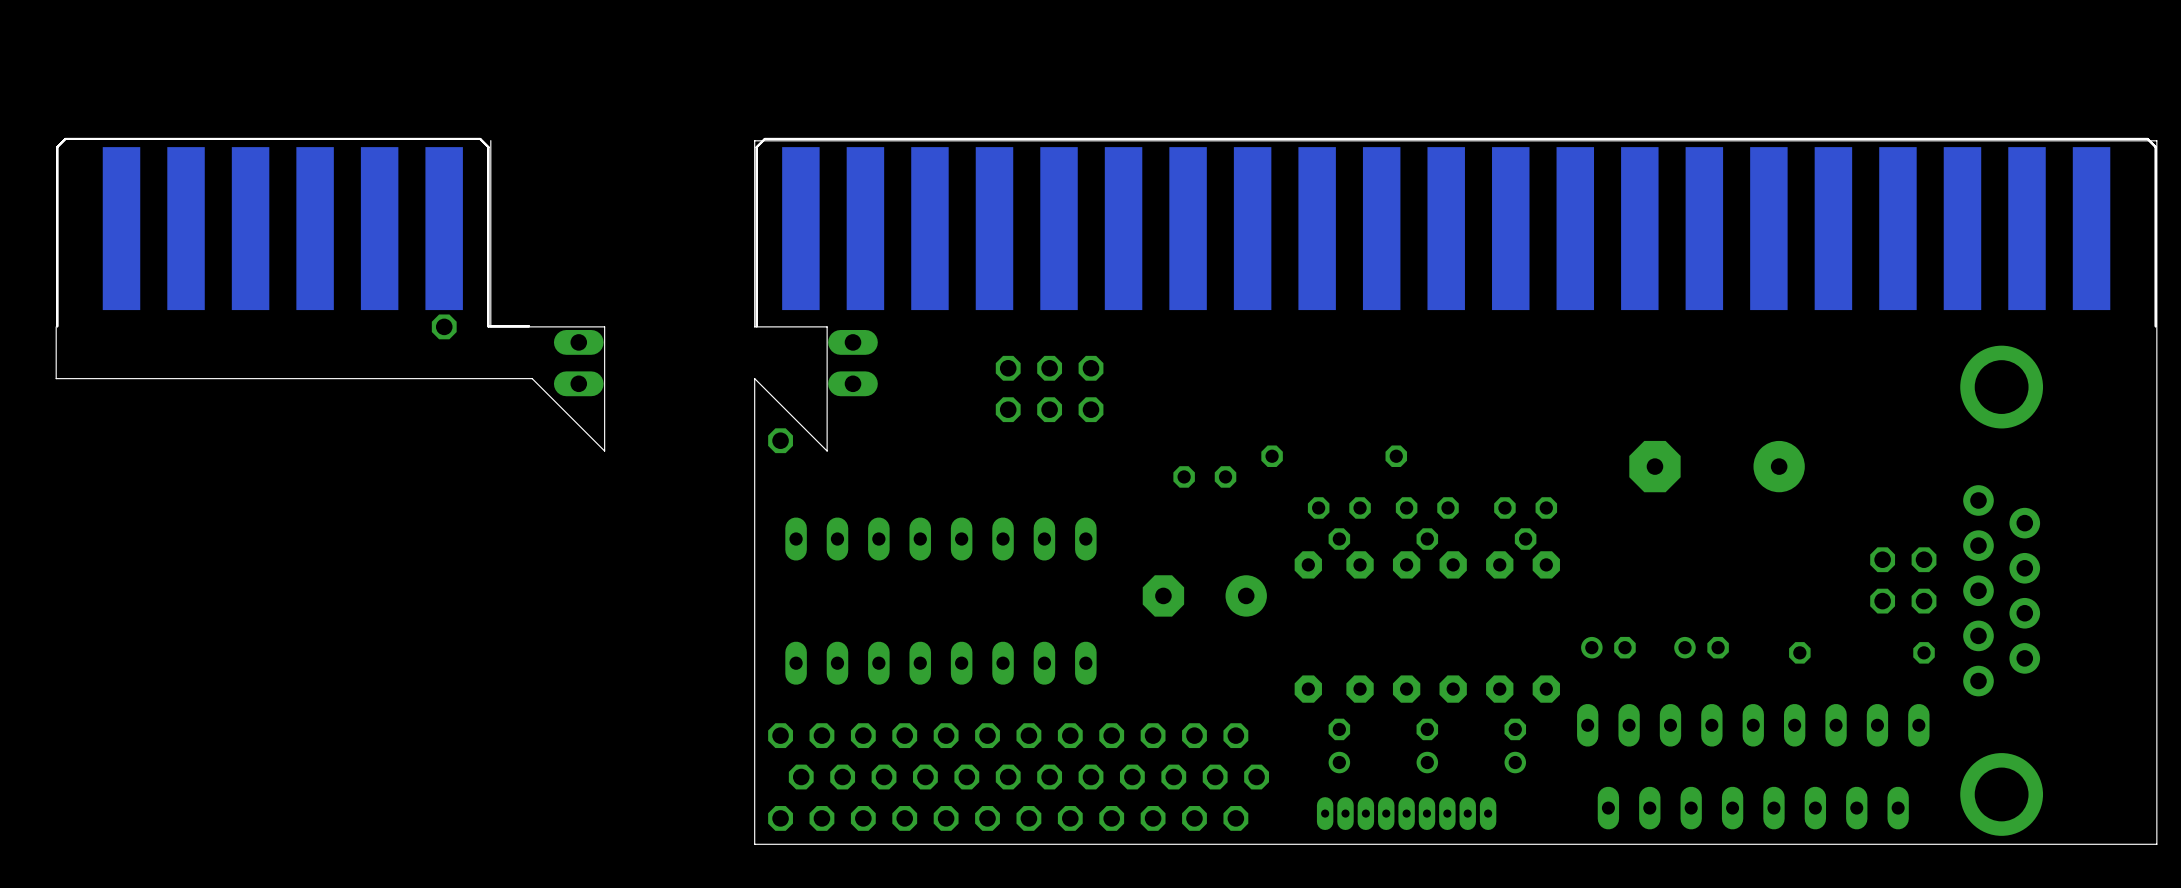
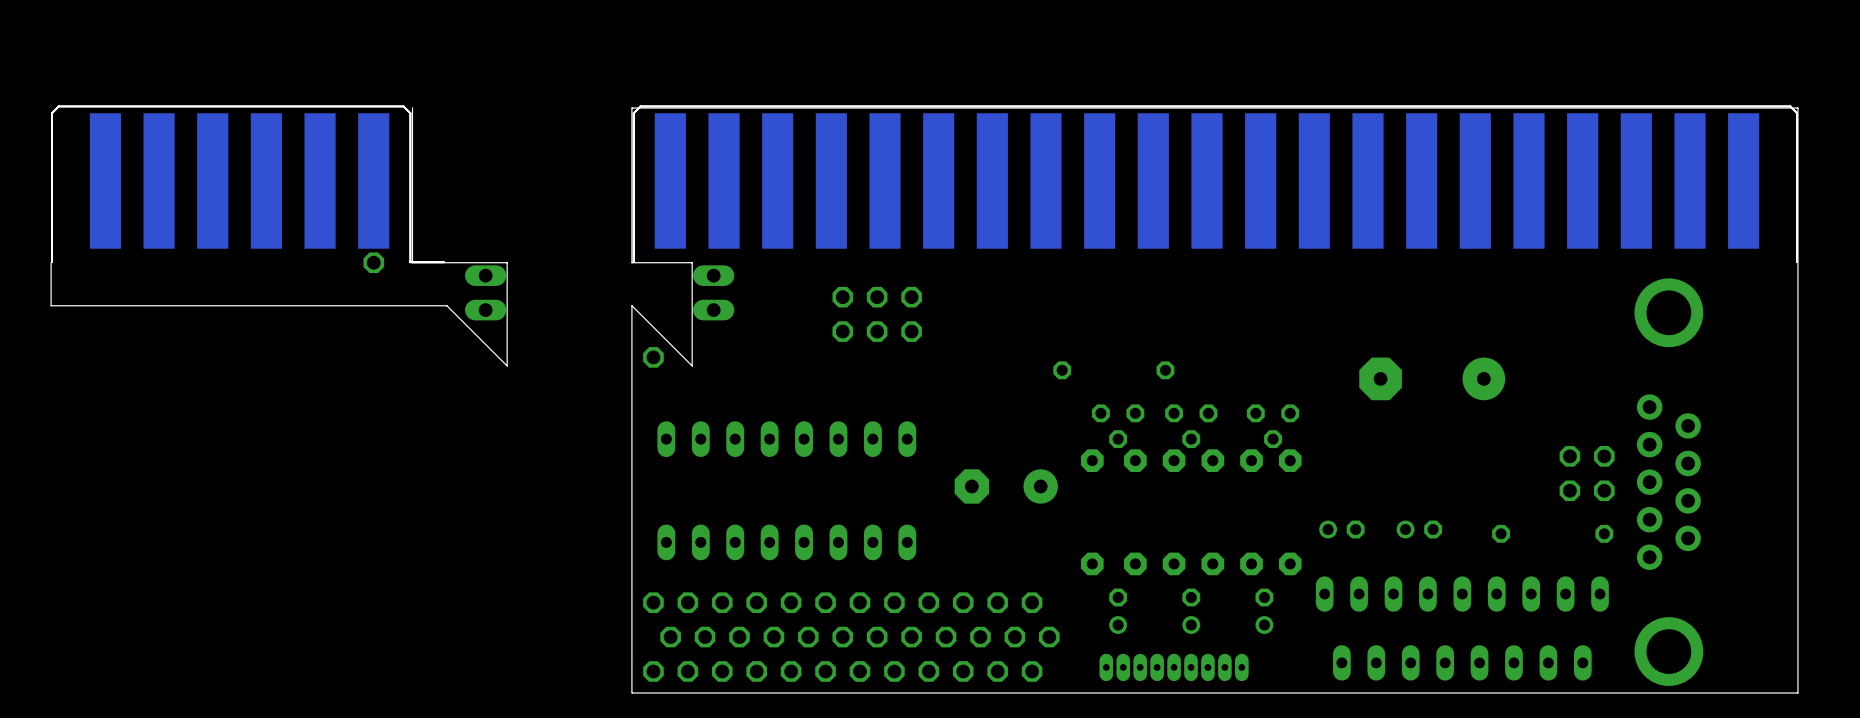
part: (1204, 476) -> none

